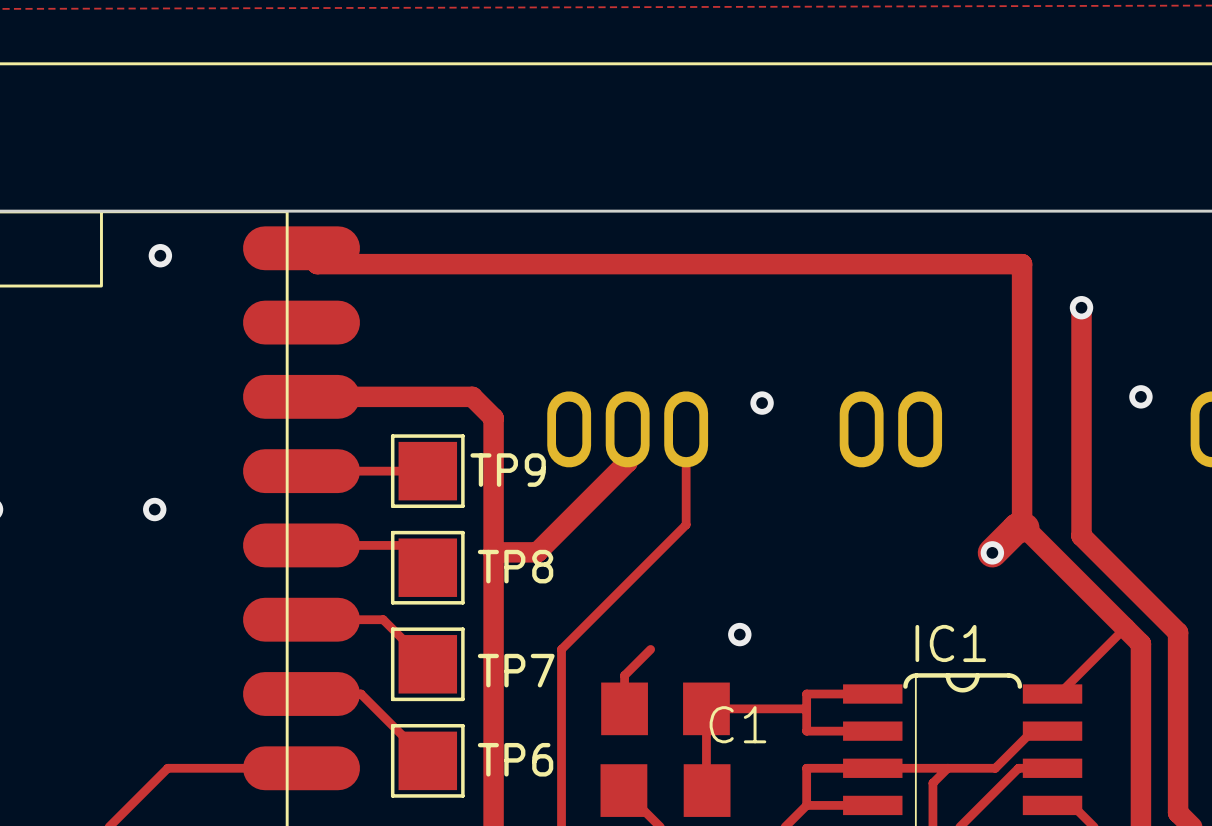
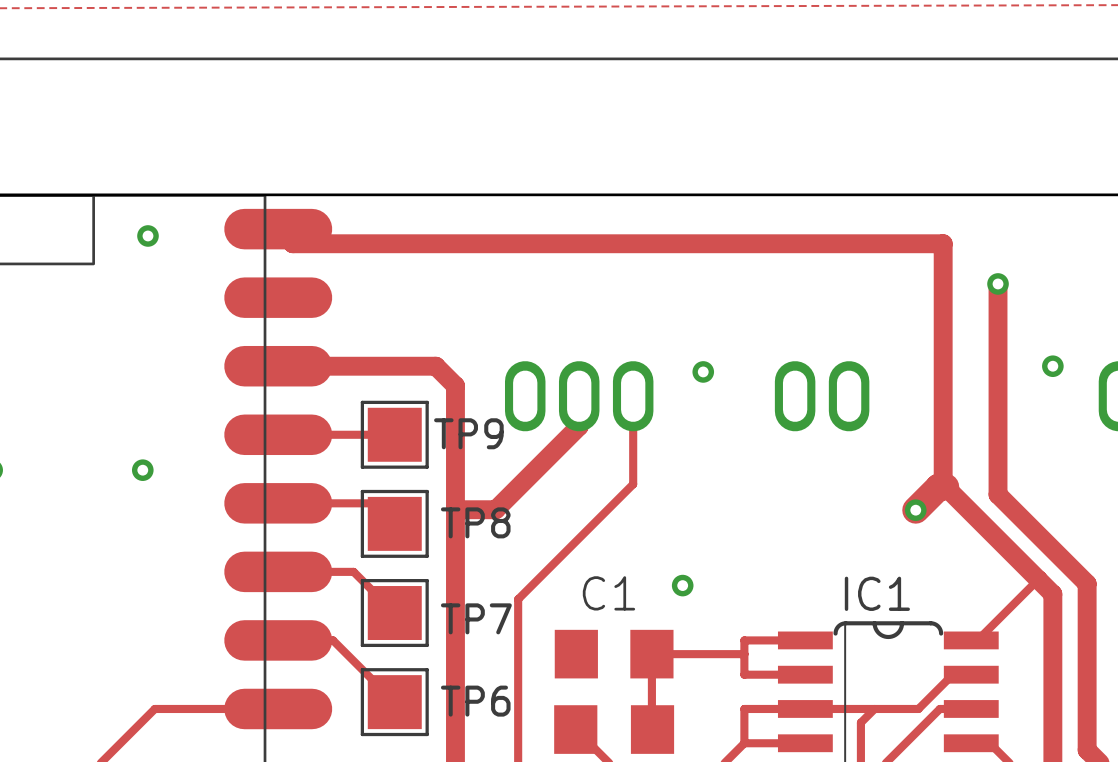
track: (650, 649) (624, 675) (624, 708) -> none
C1 name position: C1 (737, 724) -> C1 (608, 593)

